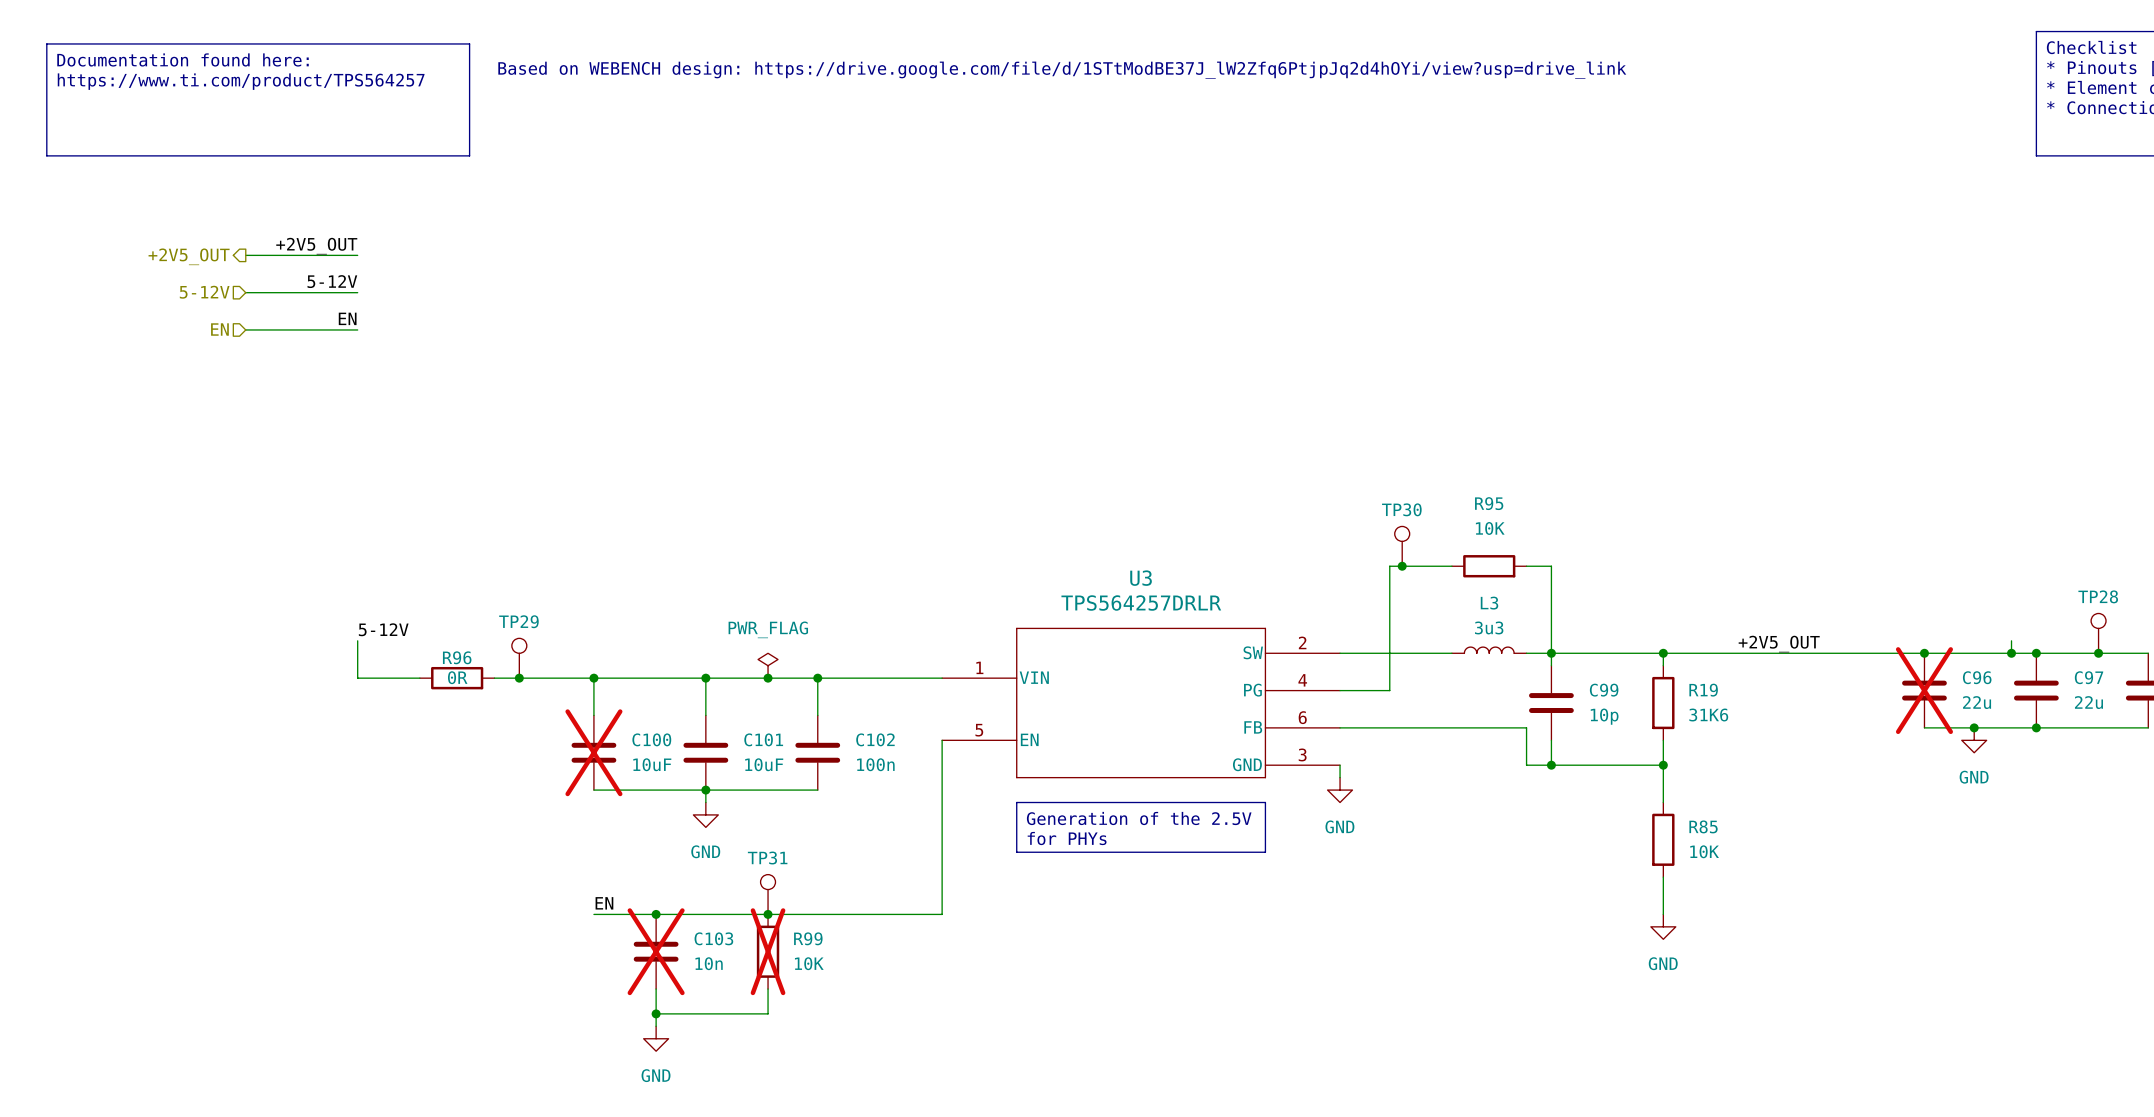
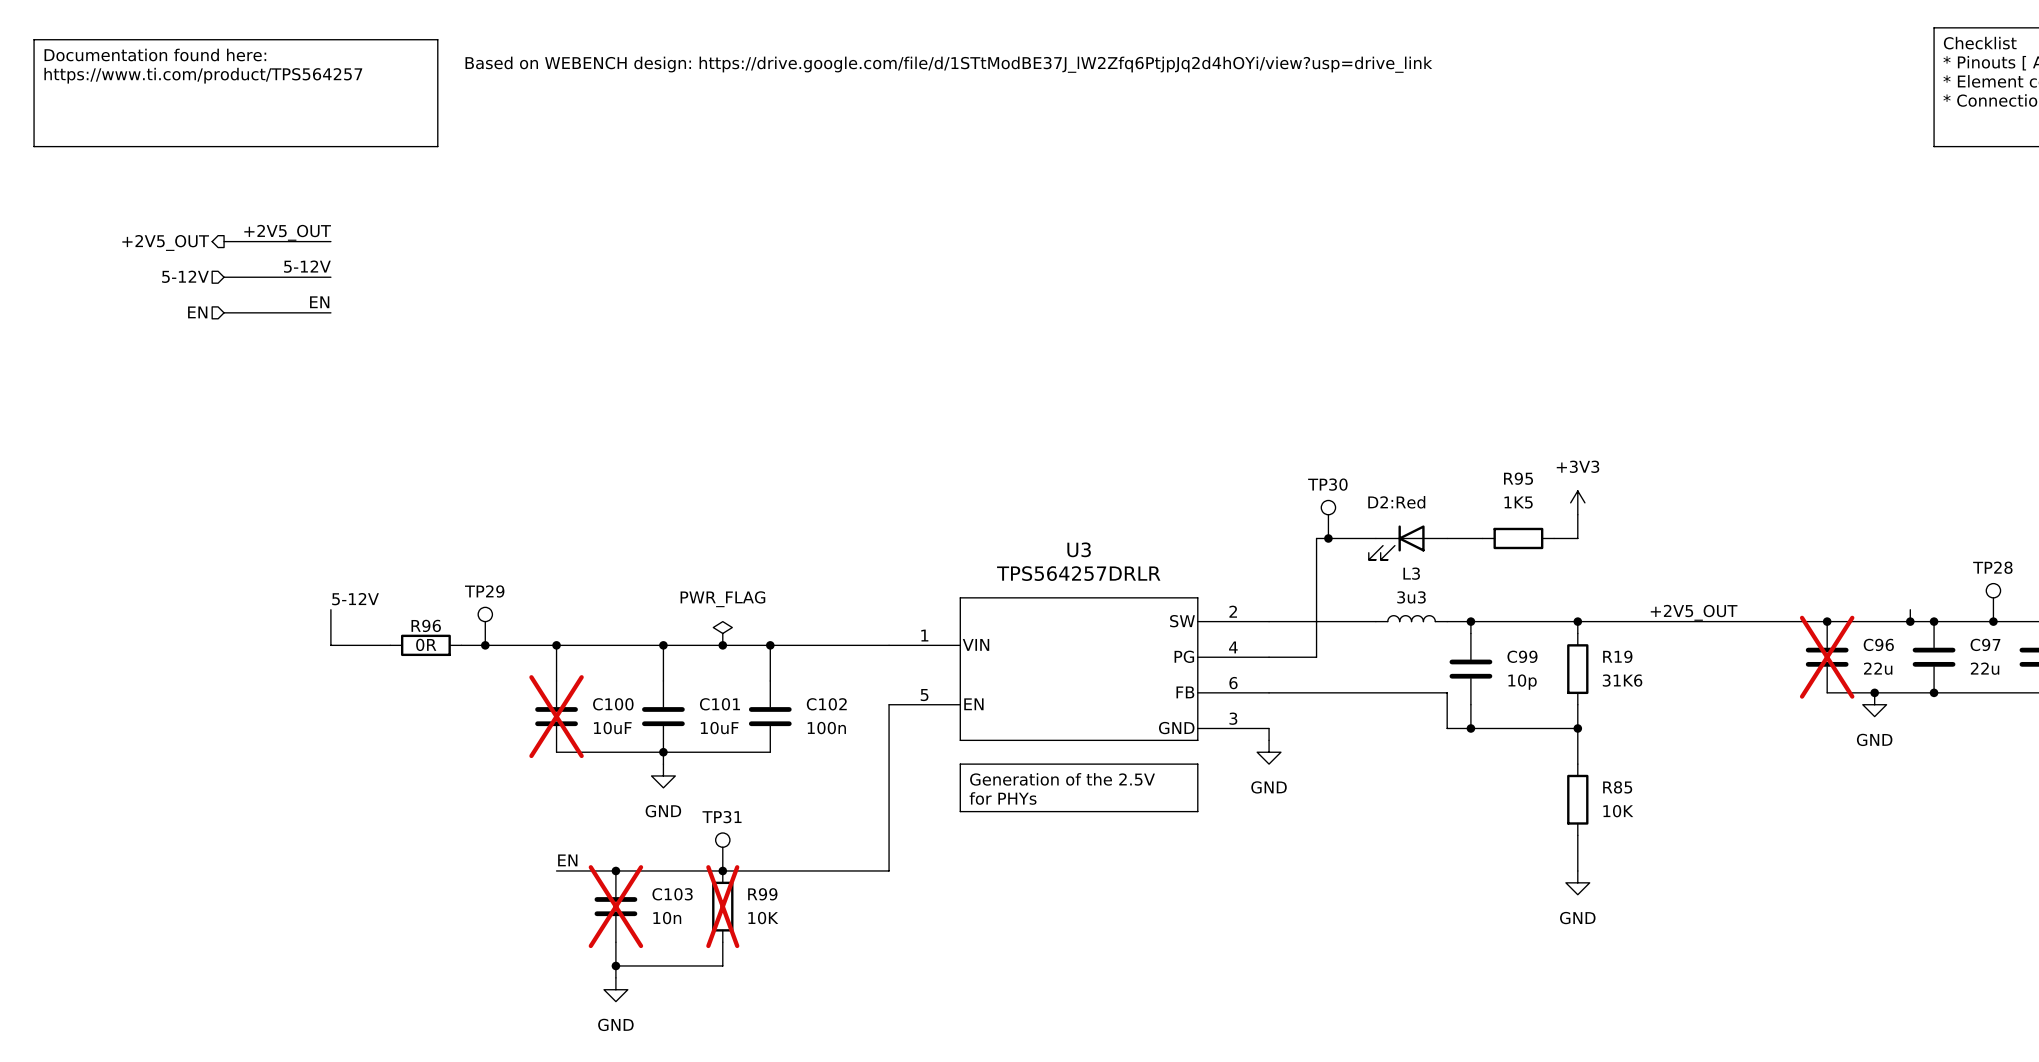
R95 value: 10K (1490, 528) -> 1K5 (1518, 502)
power symbol: none -> +3V3 (1577, 502)
wire: none -> (1577, 514) (1577, 538) (1554, 538)
R95 position: (1489, 566) -> (1518, 538)
wire: (1551, 566) (1551, 653) -> (1470, 538) (1482, 538)
part: none -> (1407, 542)

